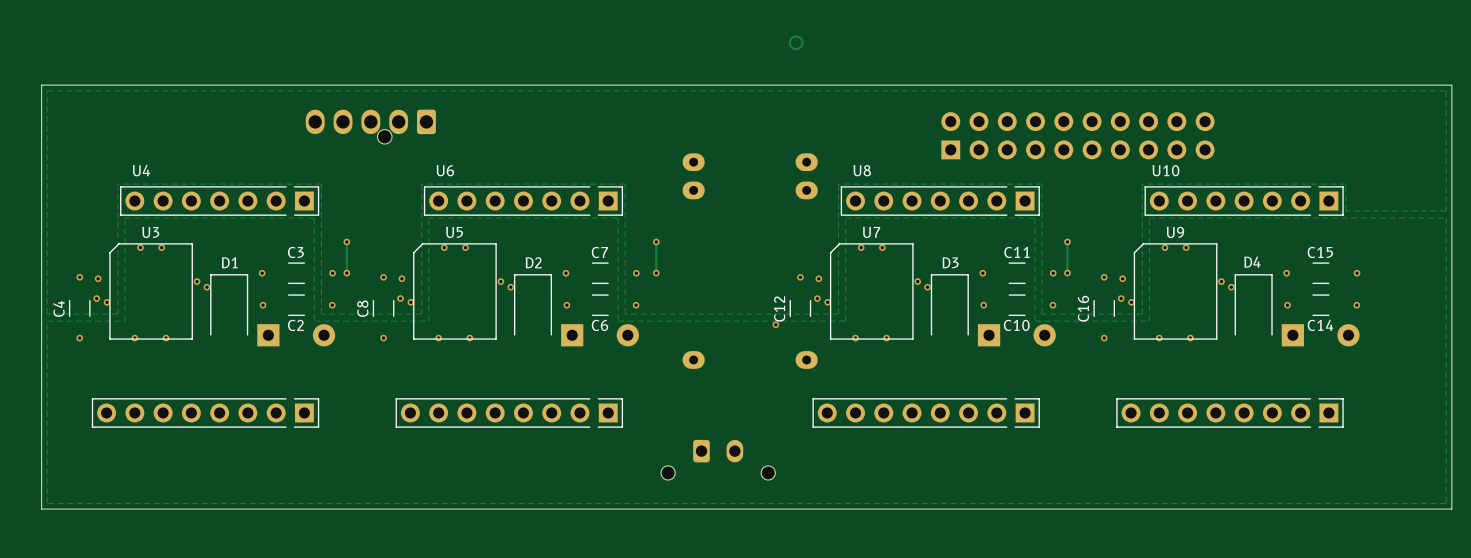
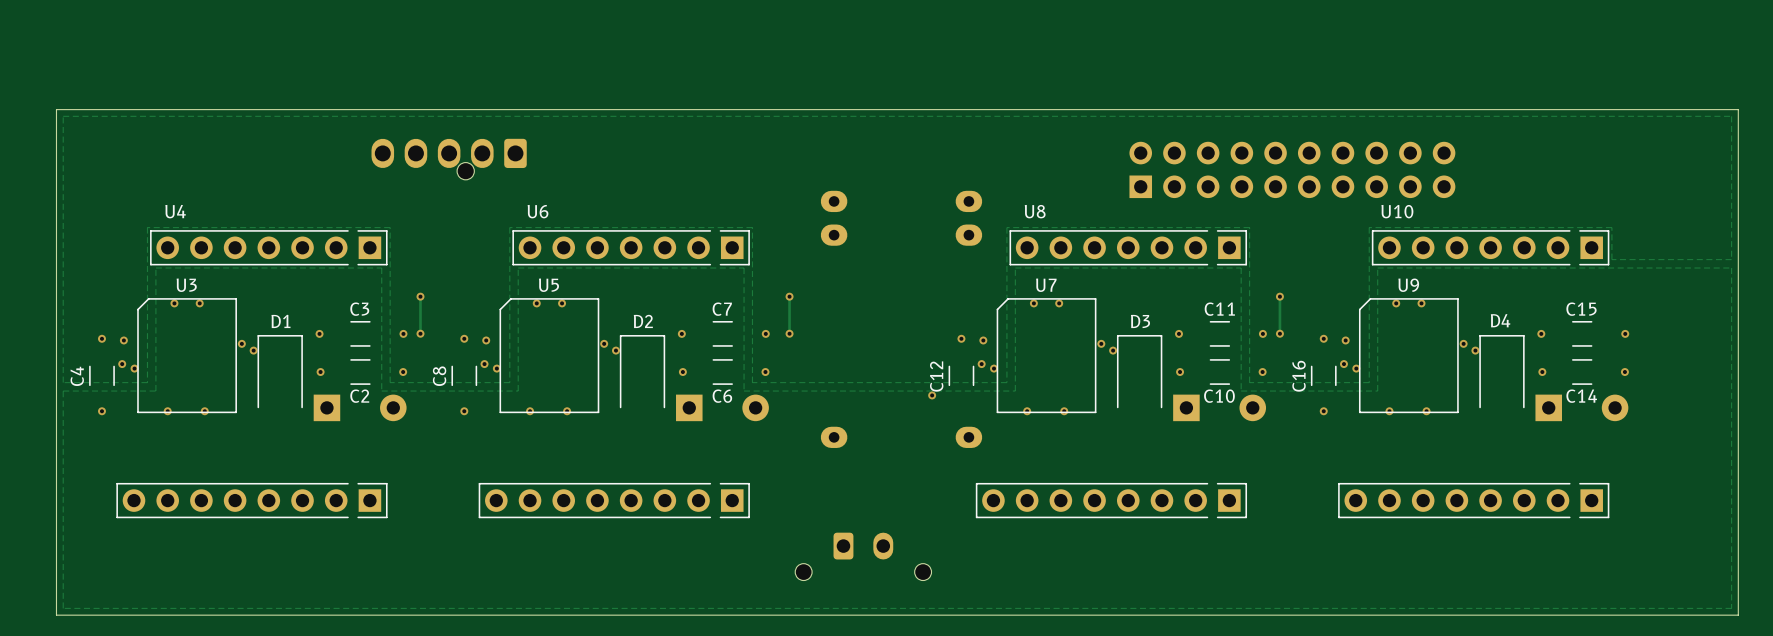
drawing: [788, 35, 804, 51] -> none

